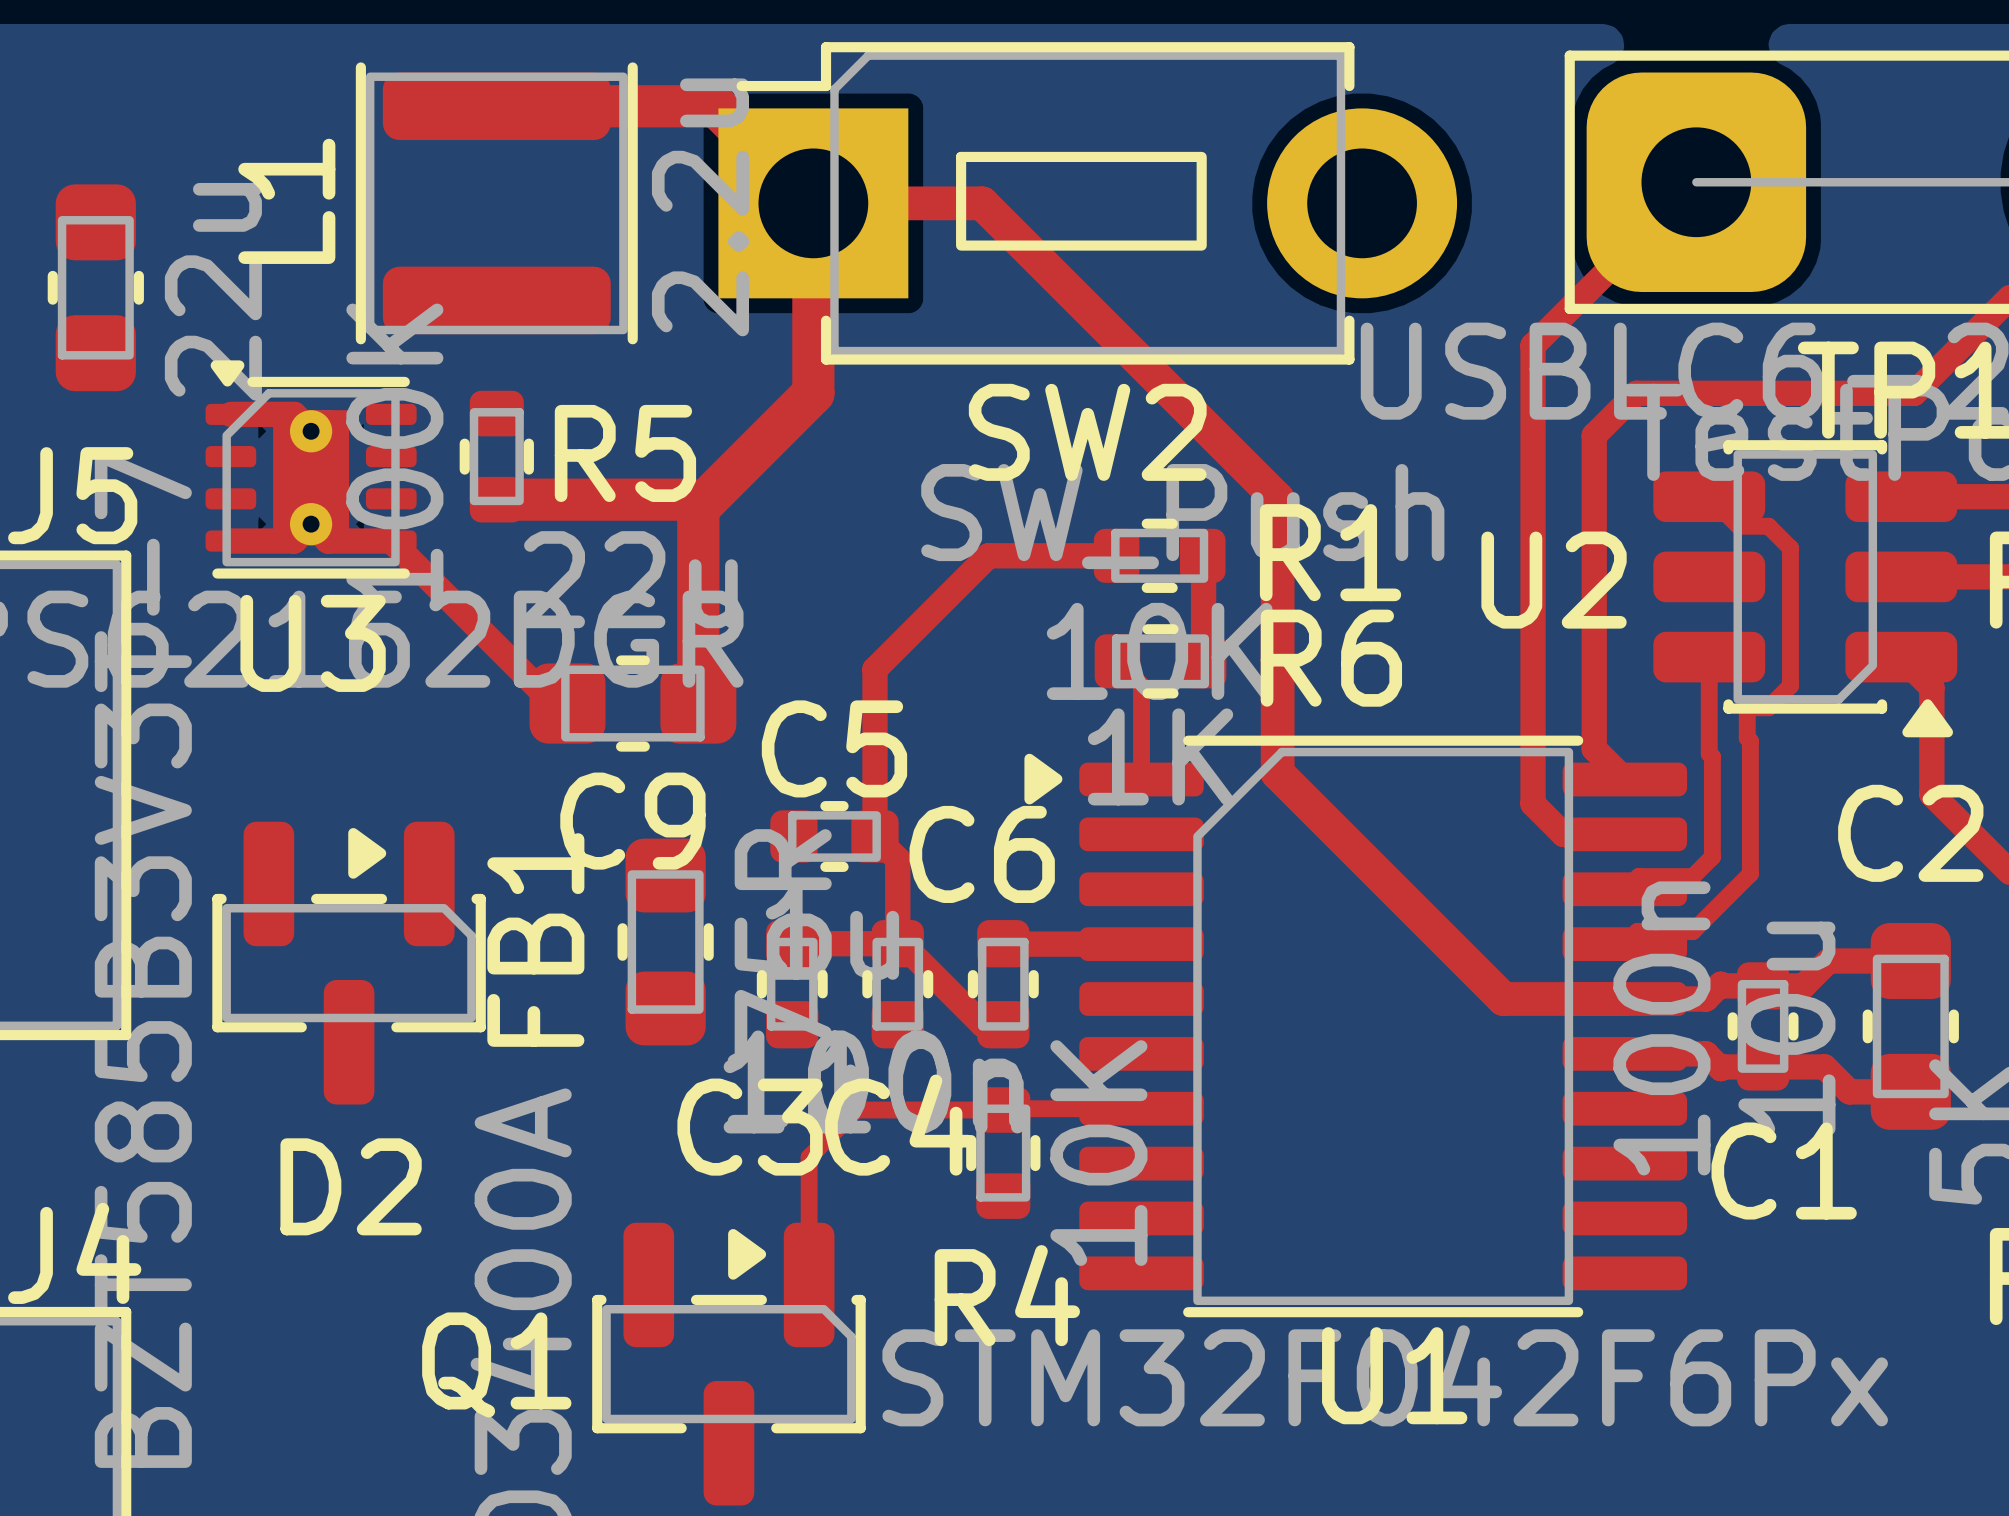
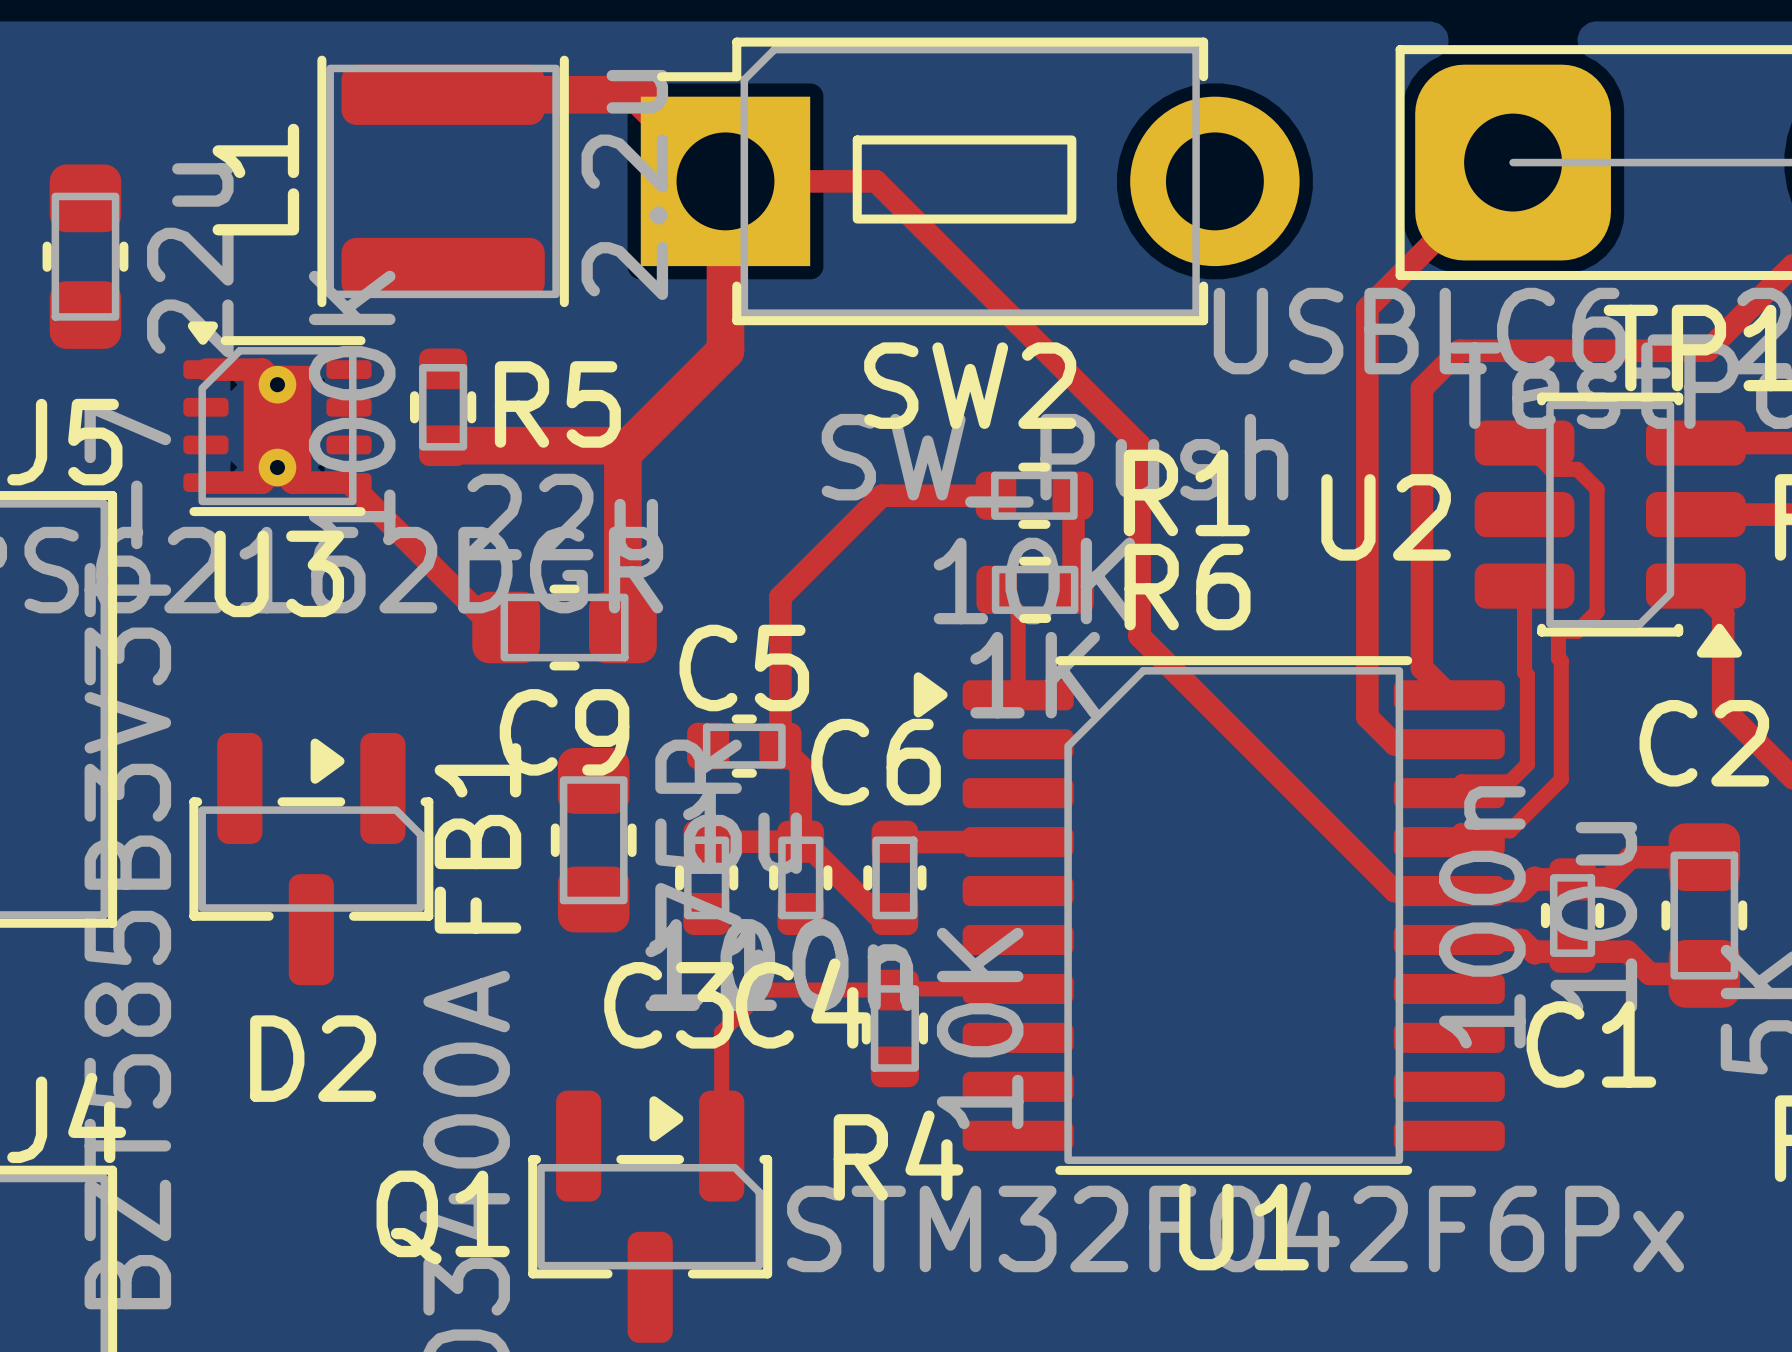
top track width: thick (813, 203) (982, 203) (1277, 498) (1277, 713) -> thin (725, 181) (876, 181) (1139, 444) (1139, 636)
top track: (1277, 713) (1277, 773) (1503, 998) (1563, 998) -> (1139, 636) (1394, 891)

